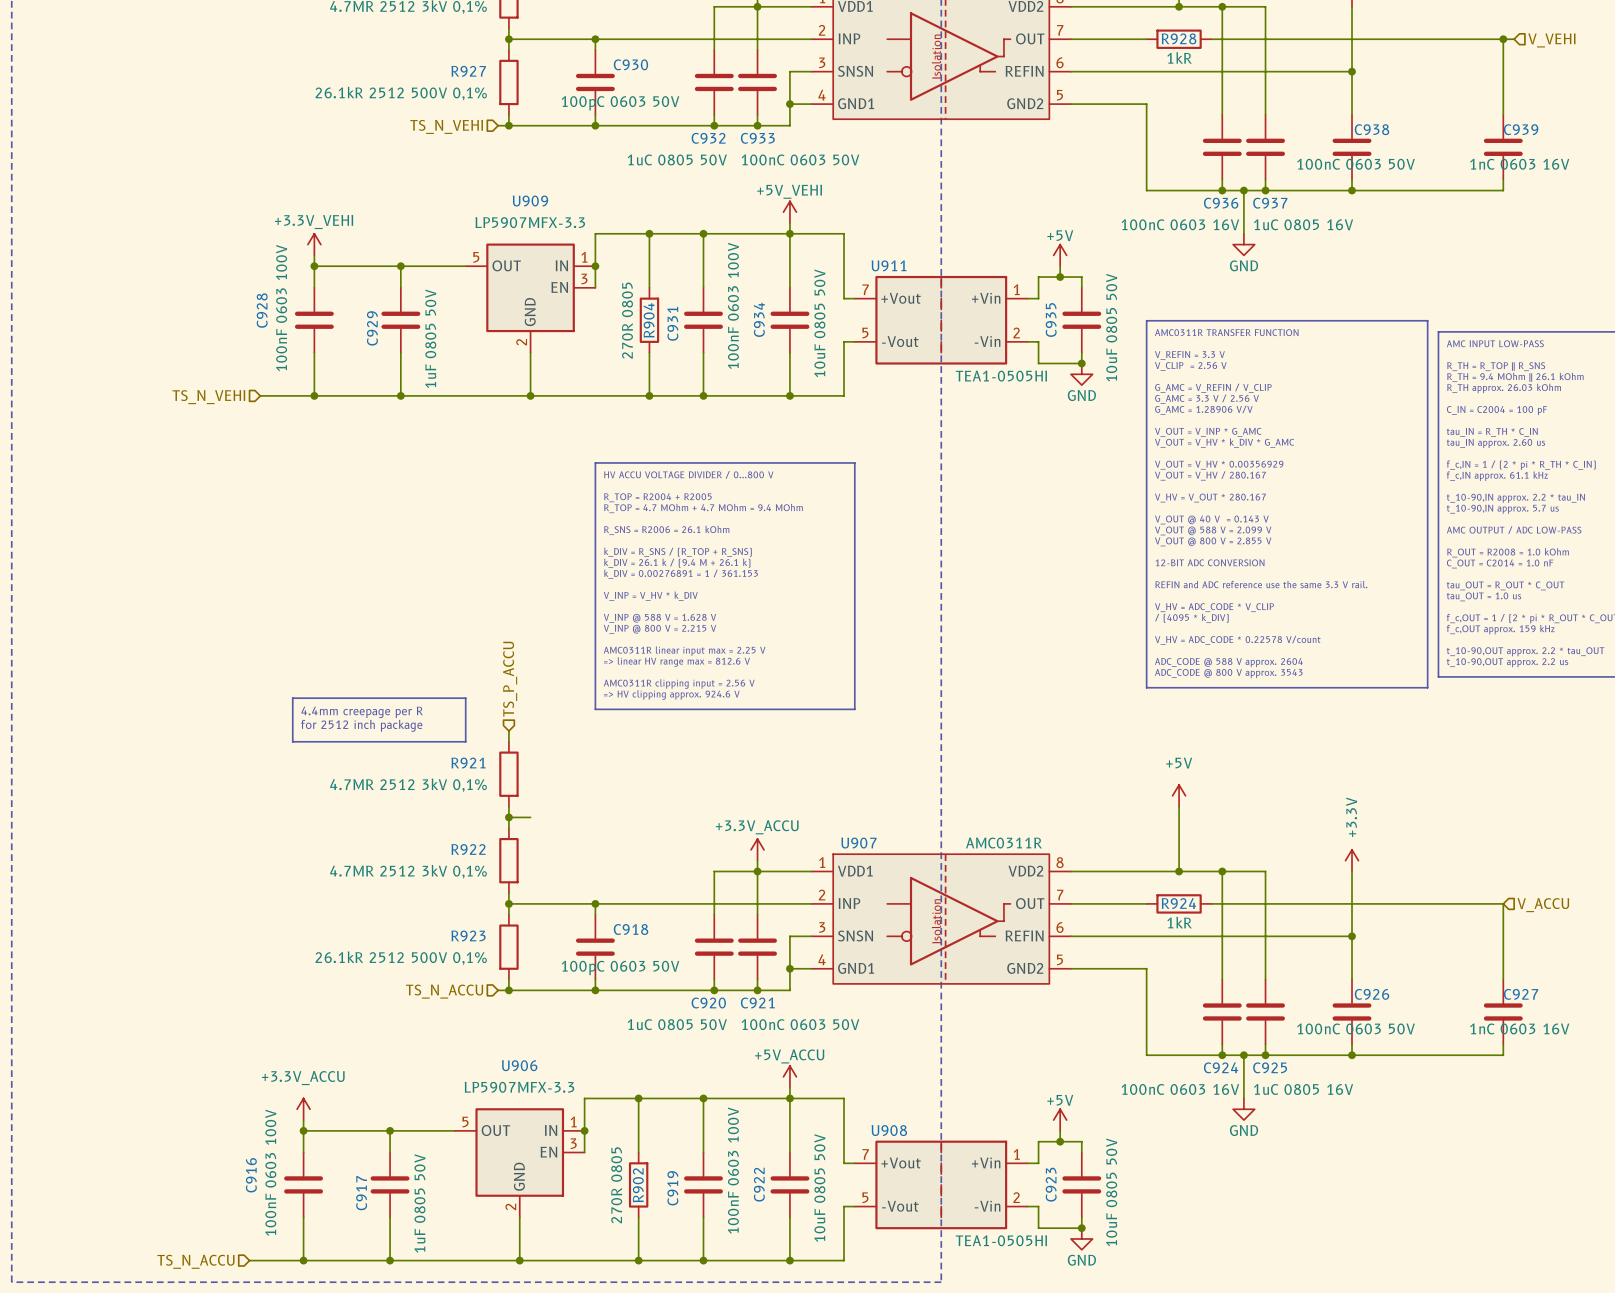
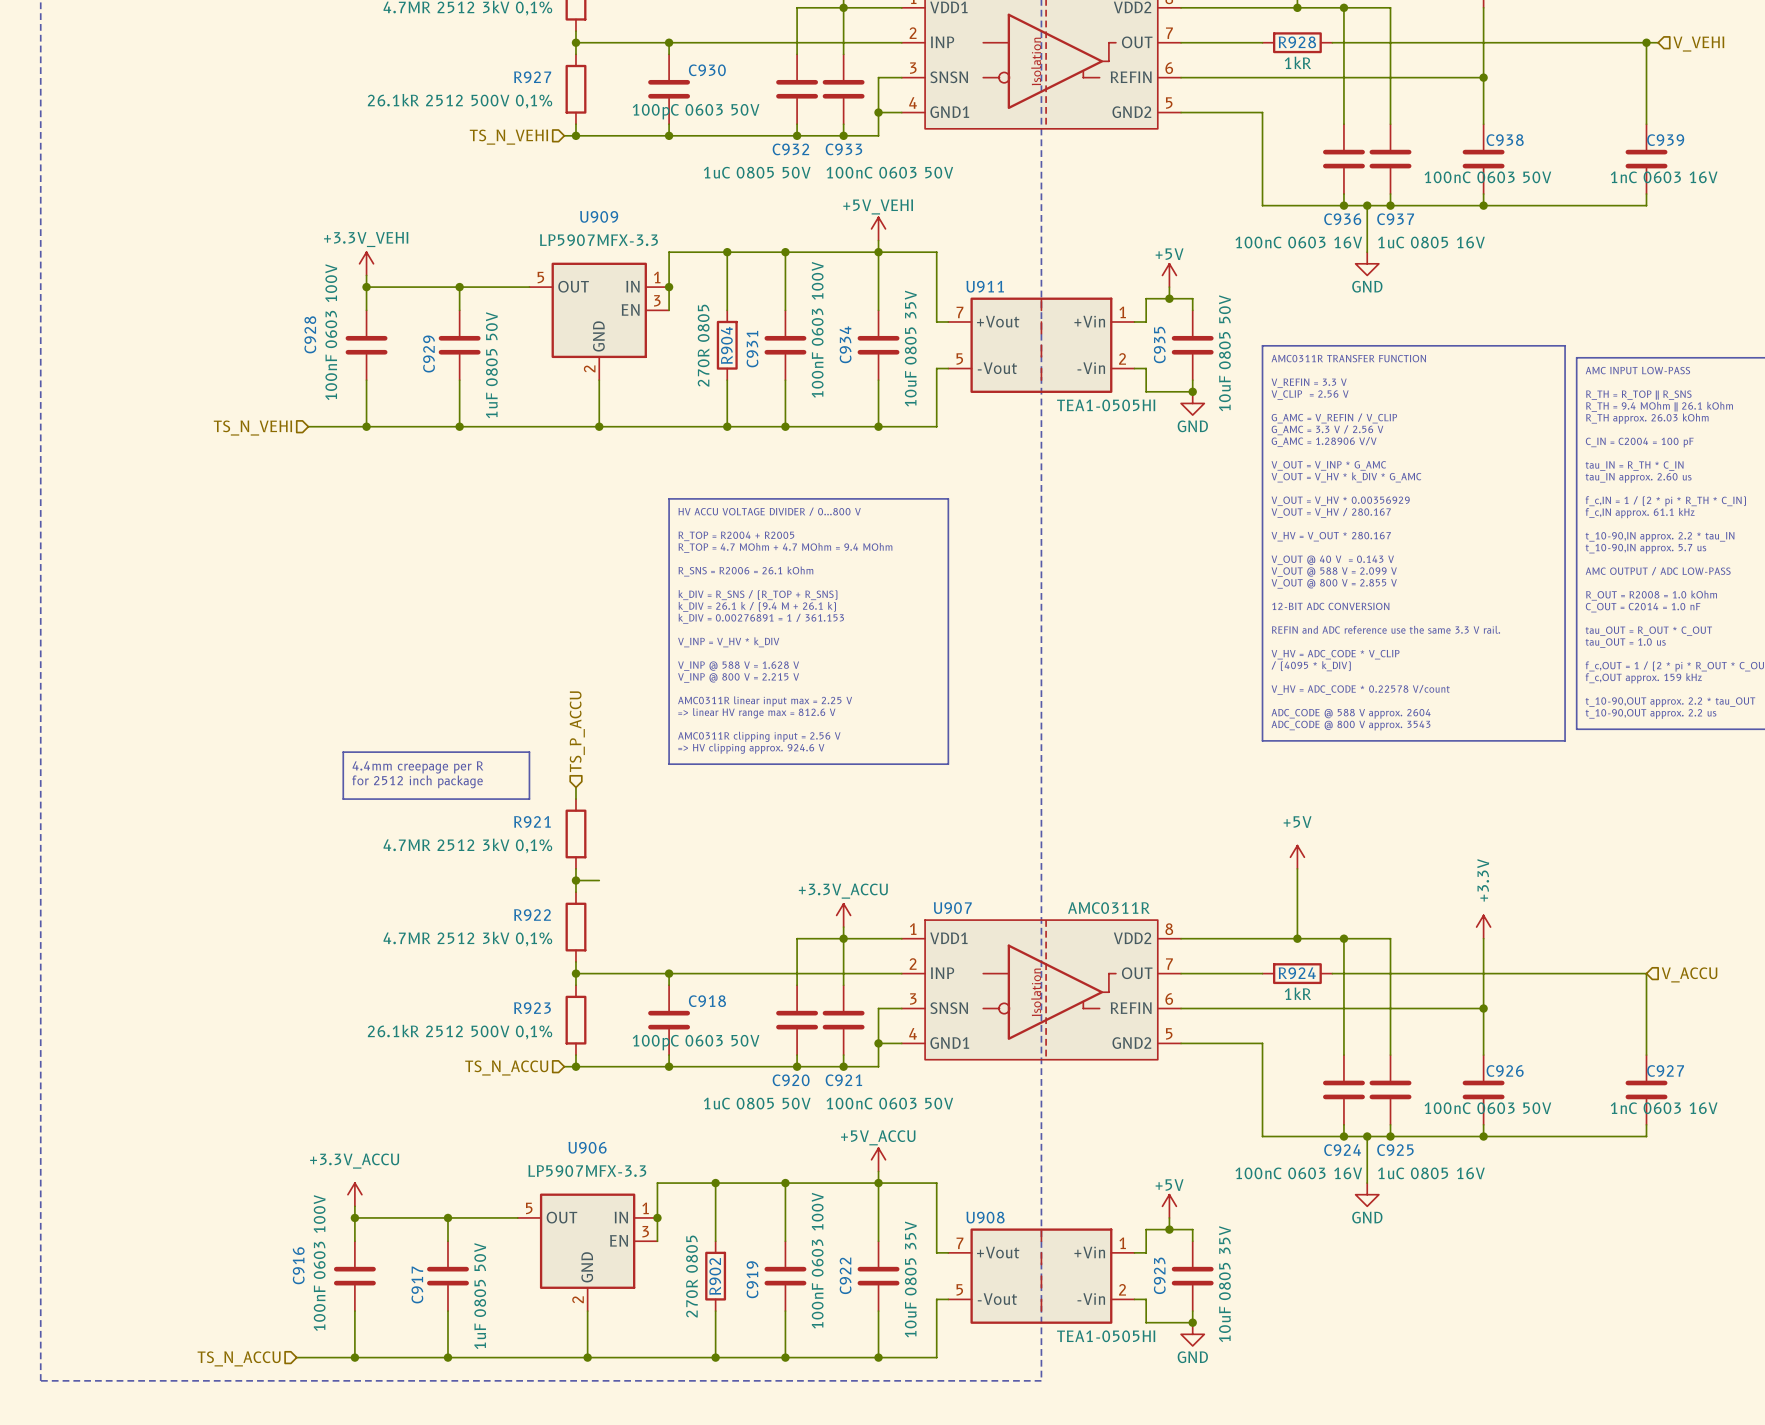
C934 value: 10uF 0805 50V (819, 323) -> 10uF 0805 35V (910, 348)
C922 value: 10uF 0805 50V (819, 1188) -> 10uF 0805 35V (910, 1279)
C923 value: 10uF 0805 50V (1111, 1192) -> 10uF 0805 35V (1224, 1284)

